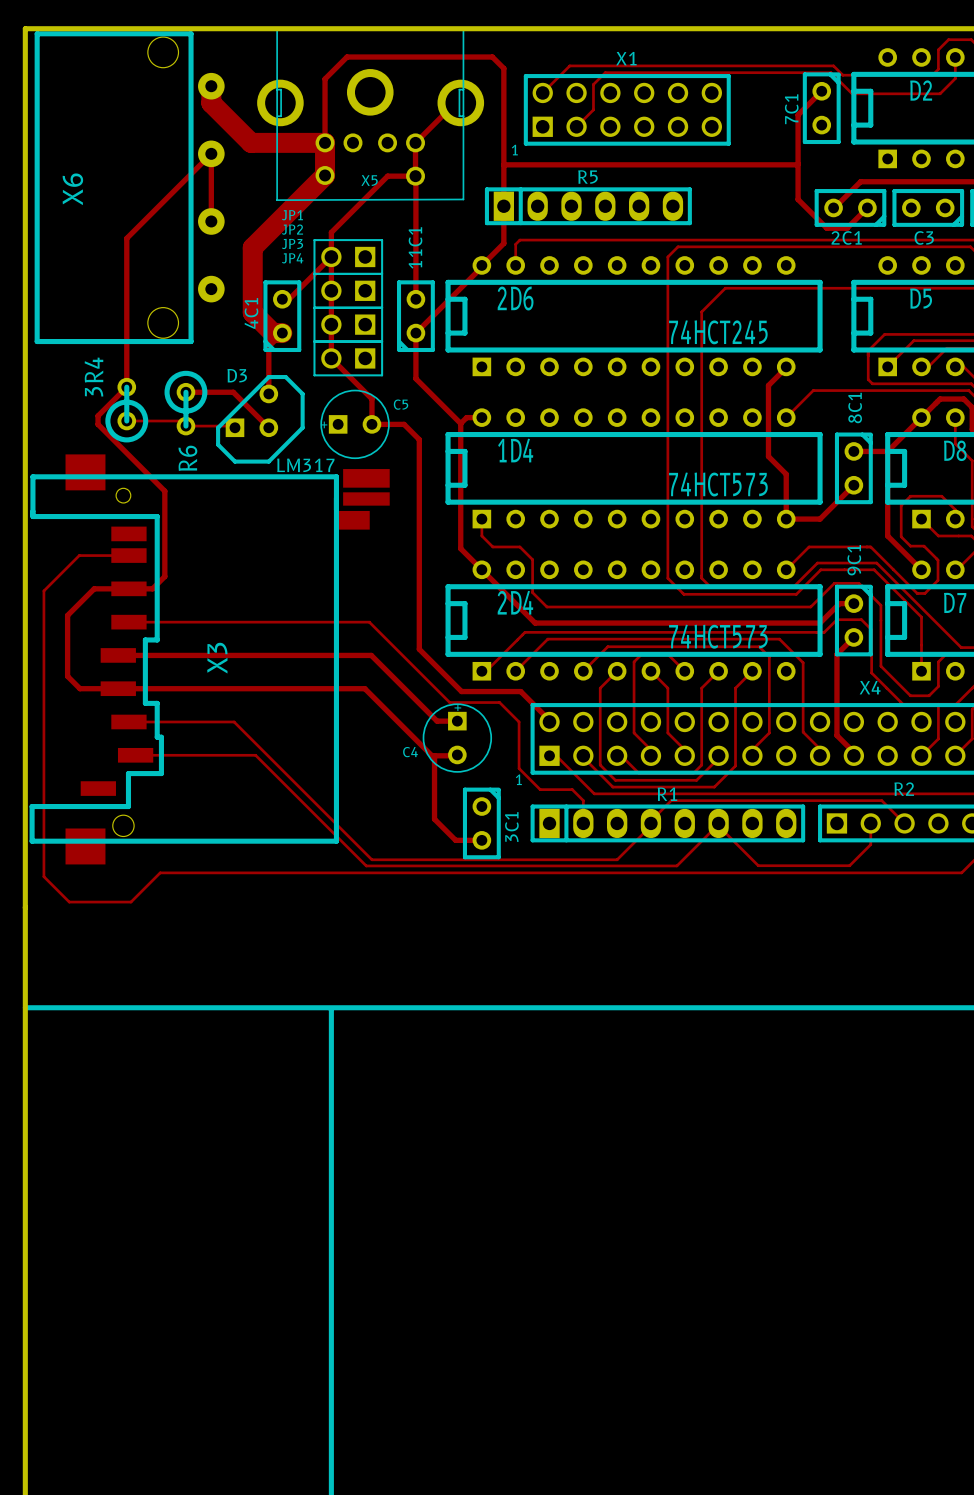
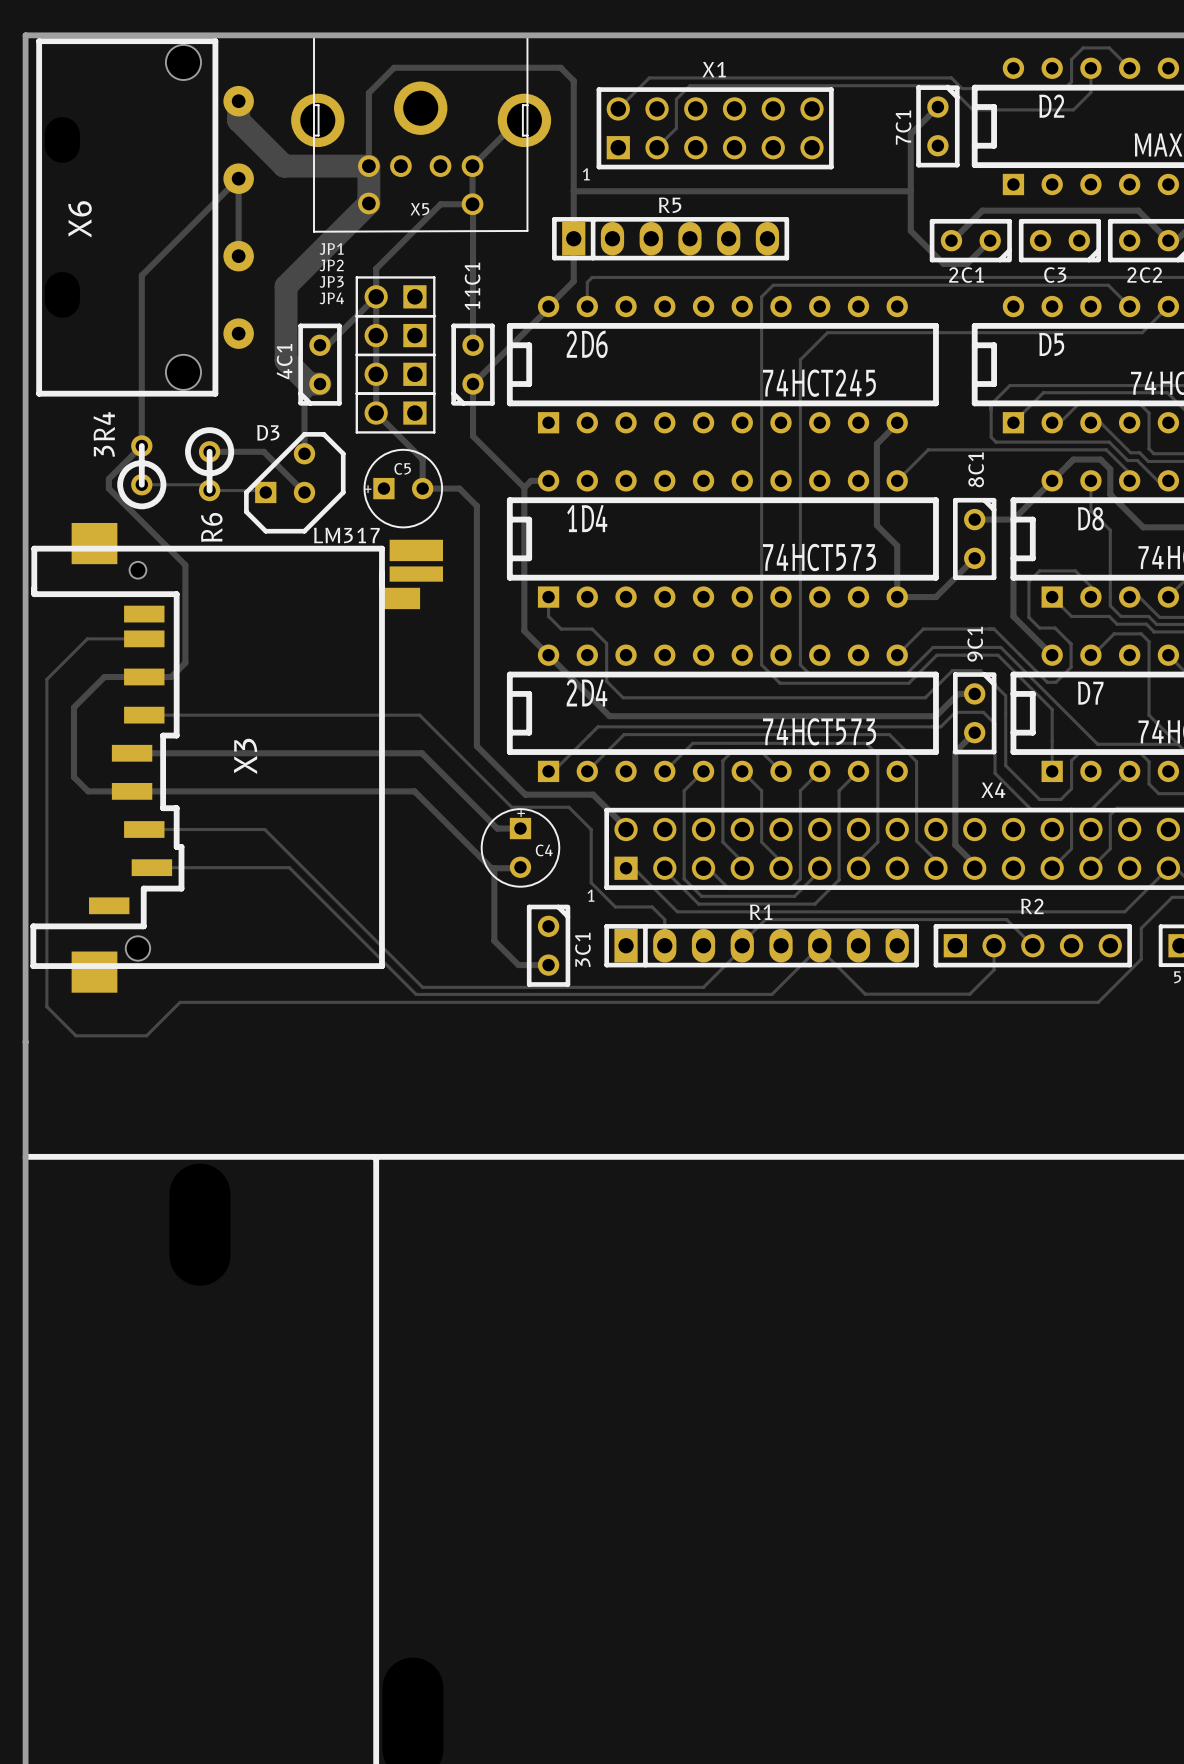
C5 name position: C5 (401, 404) -> C5 (402, 468)
C4 name position: C4 (410, 752) -> C4 (544, 850)

